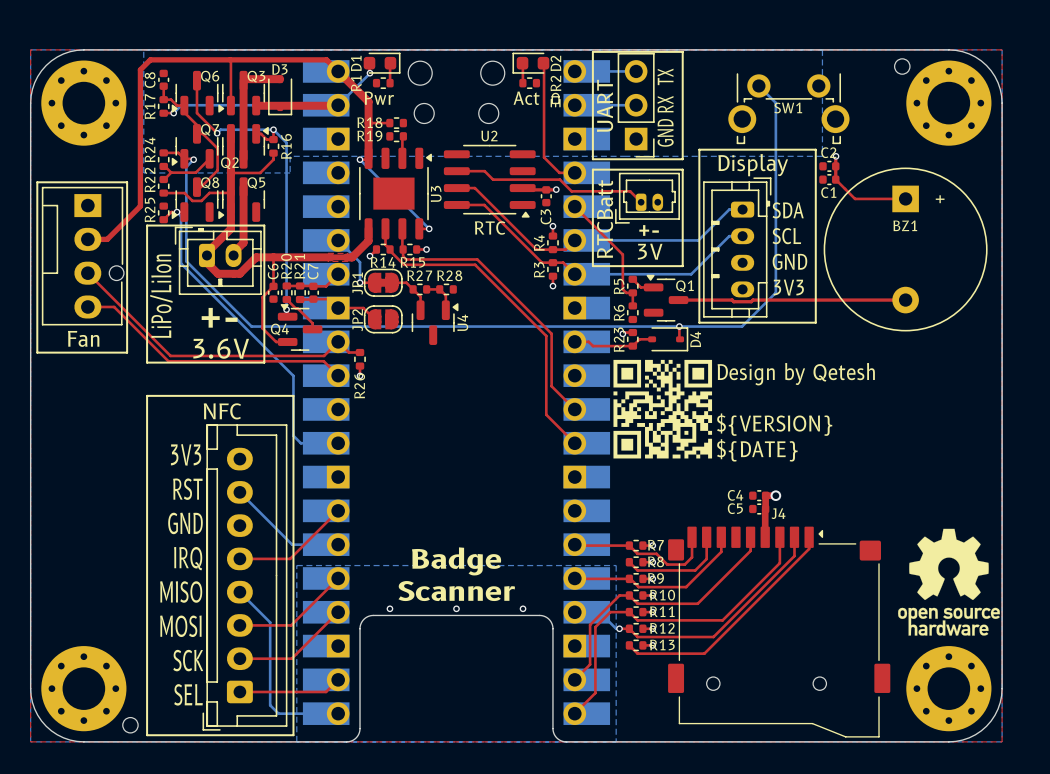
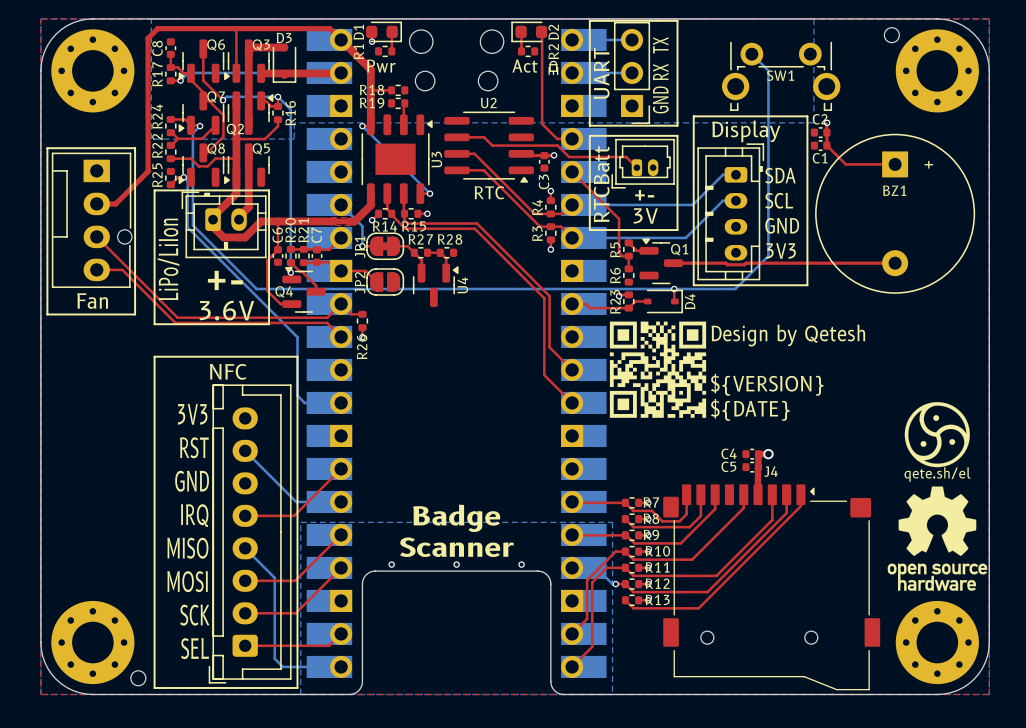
bottom track: (369, 73) (338, 105) -> none
drawing: none -> [904, 402, 970, 468]
text: none -> qete.sh/el (937, 474)

